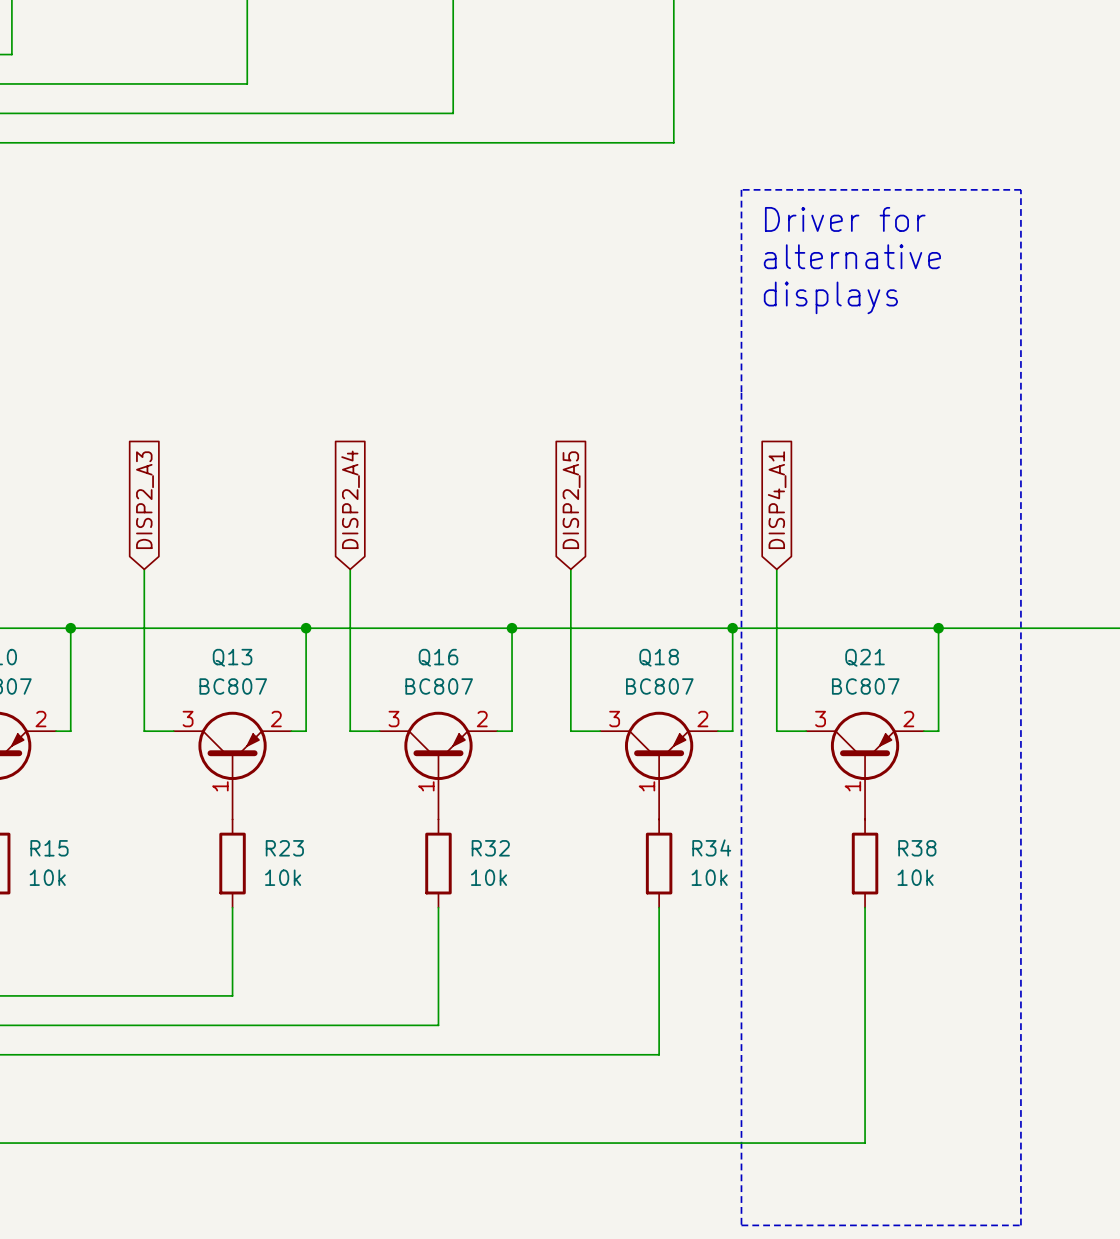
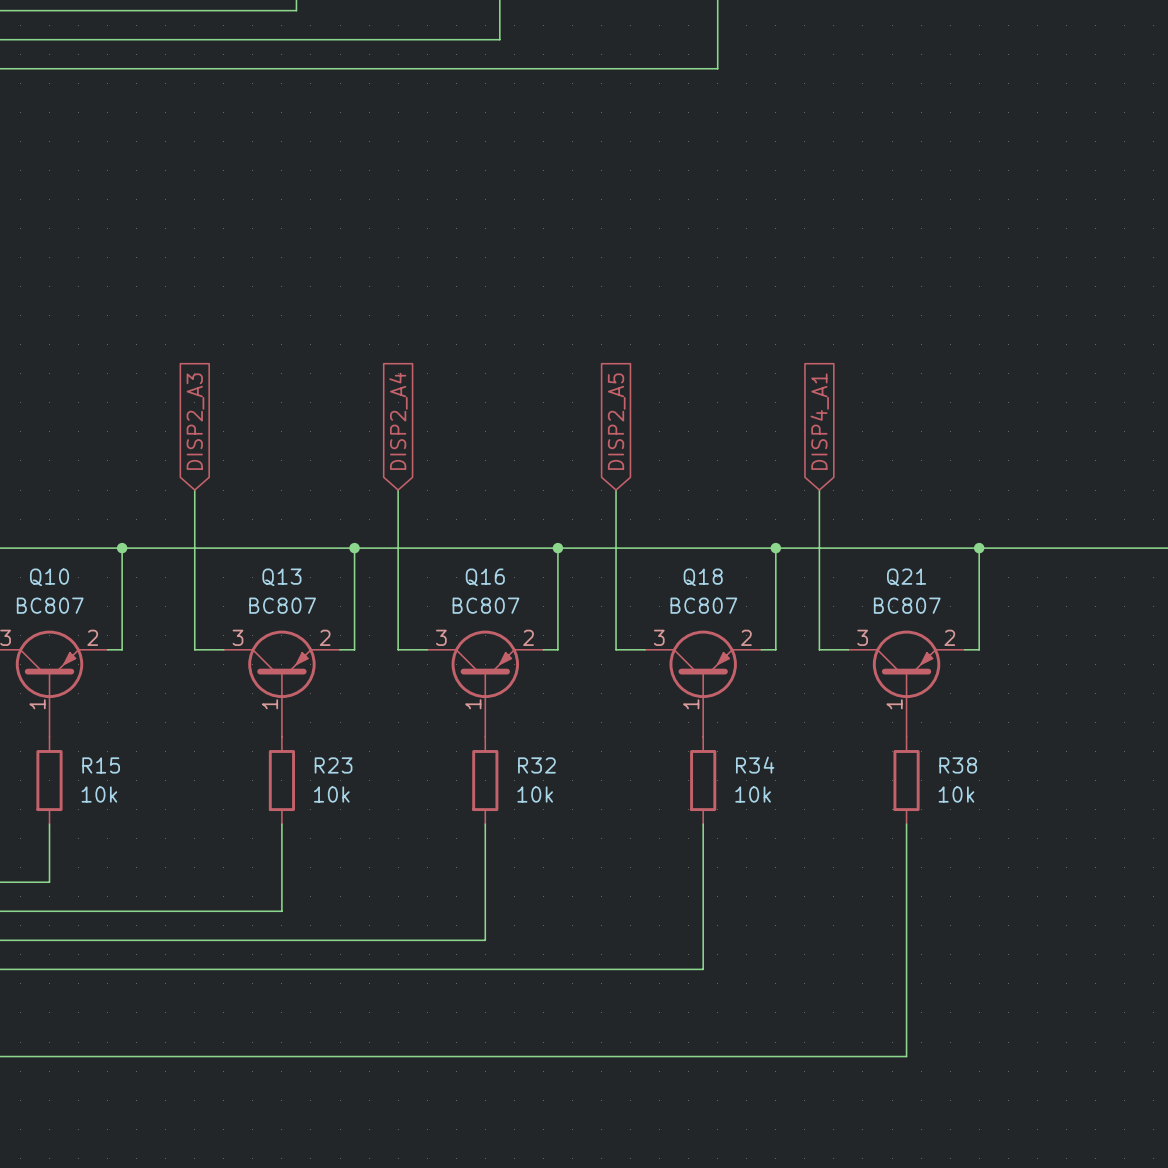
line: (741, 189) (1020, 189) (1020, 1225) (741, 1225) (741, 189) -> none
text: Driver for (845, 219) -> none
text: alternative (852, 256) -> none
text: displays (830, 297) -> none

